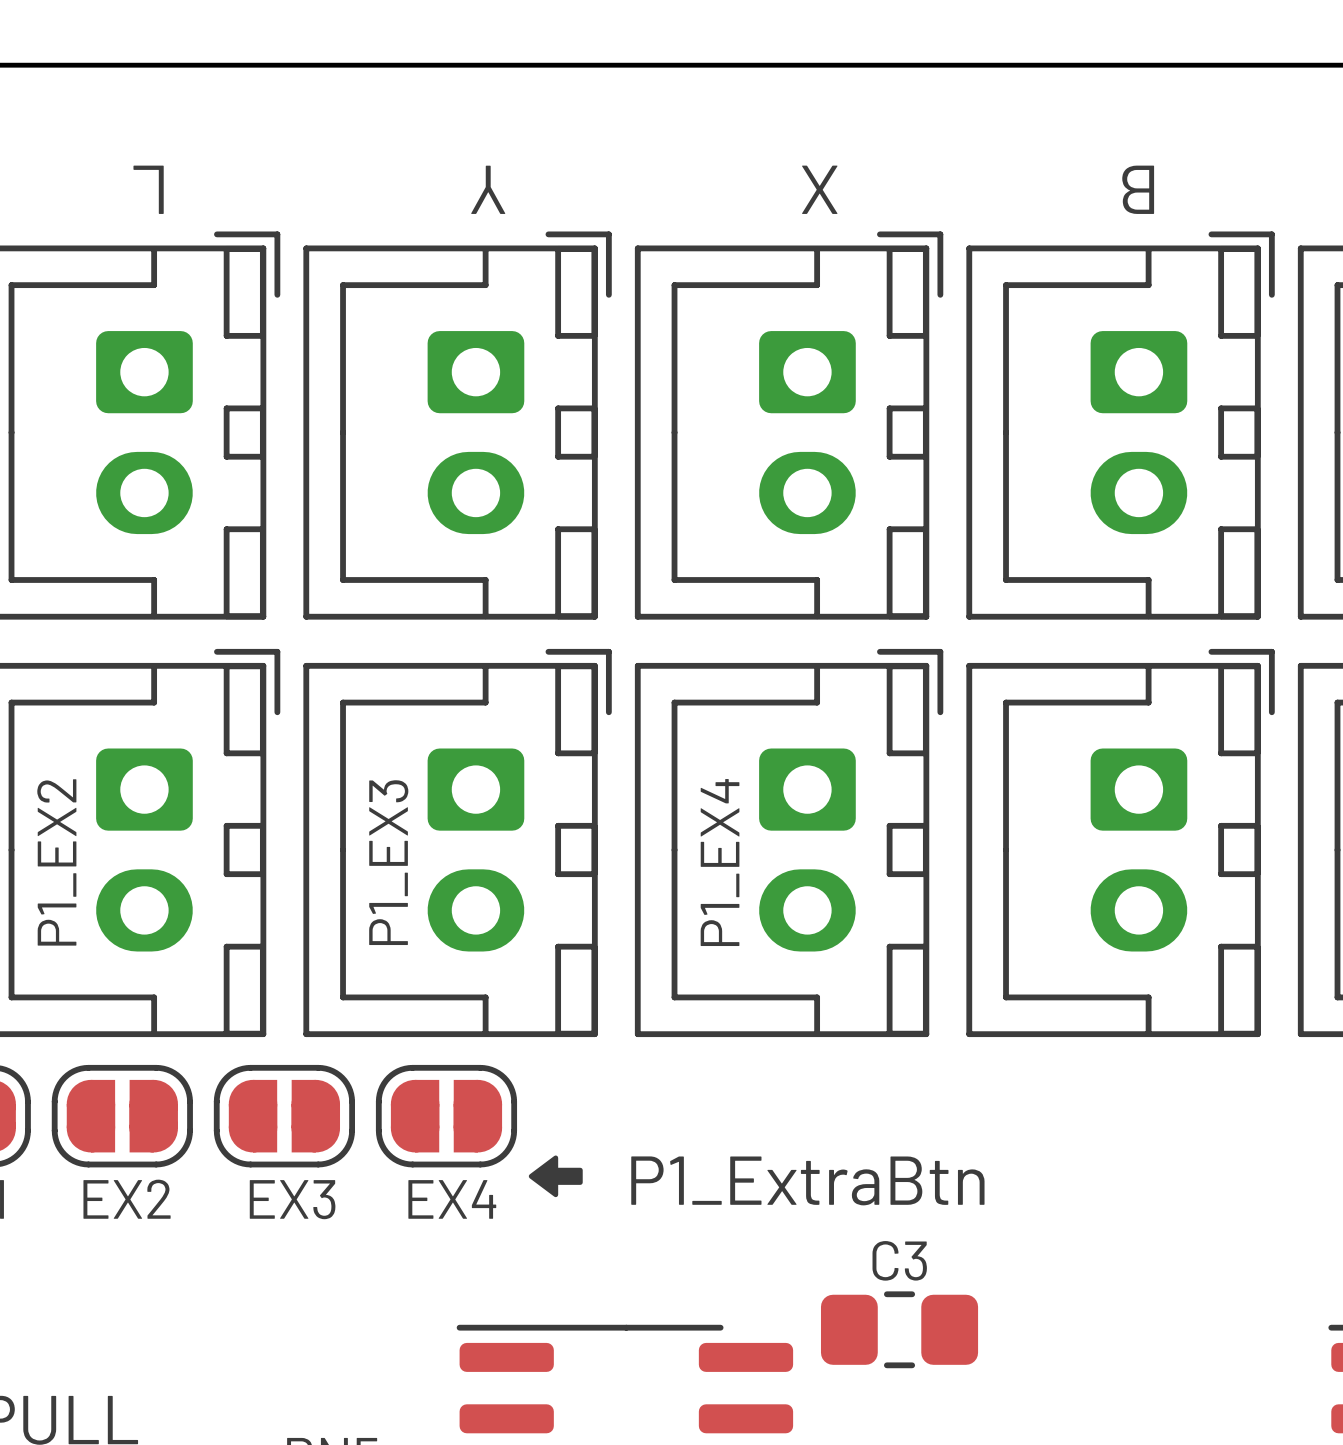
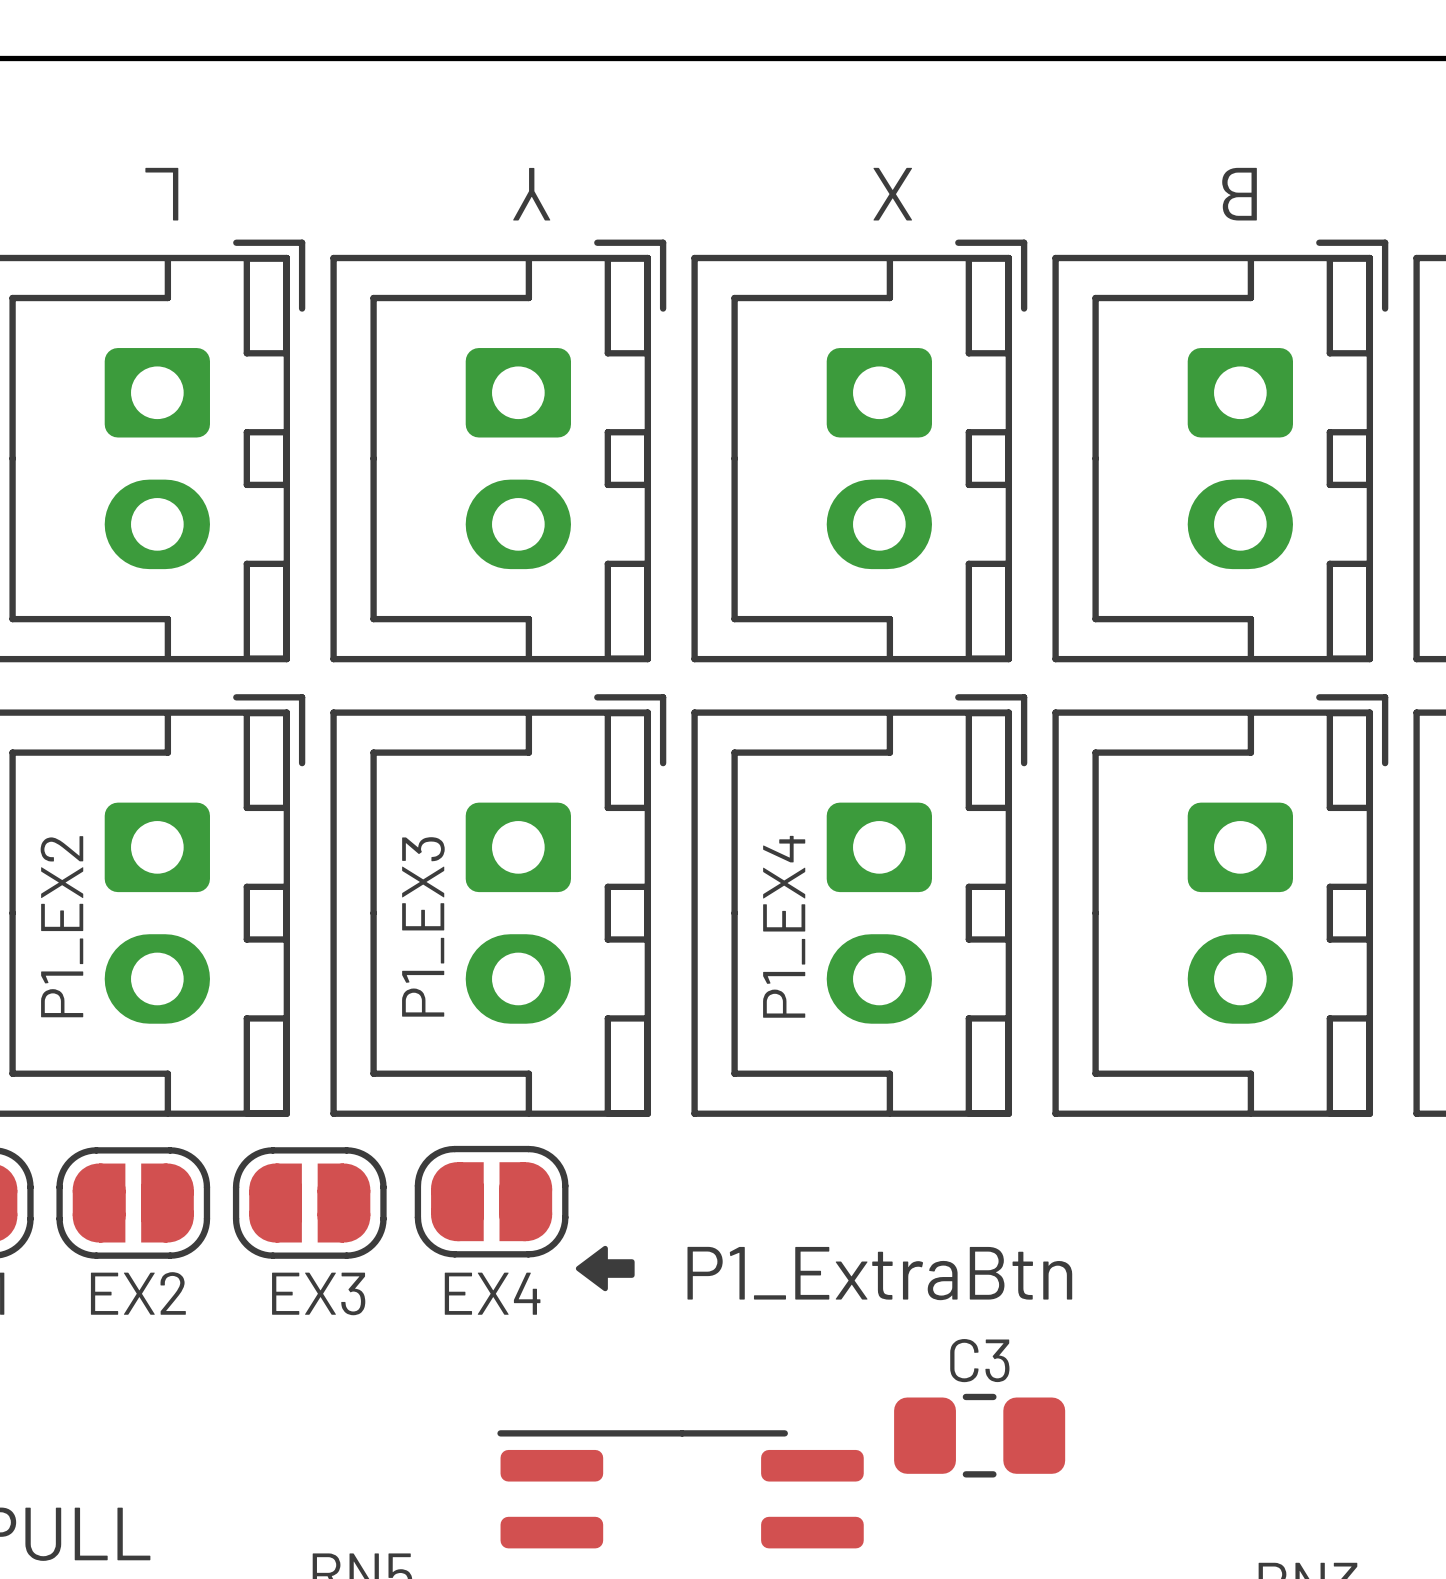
part footprint: [375, 1064, 518, 1168] -> [414, 1145, 569, 1258]

